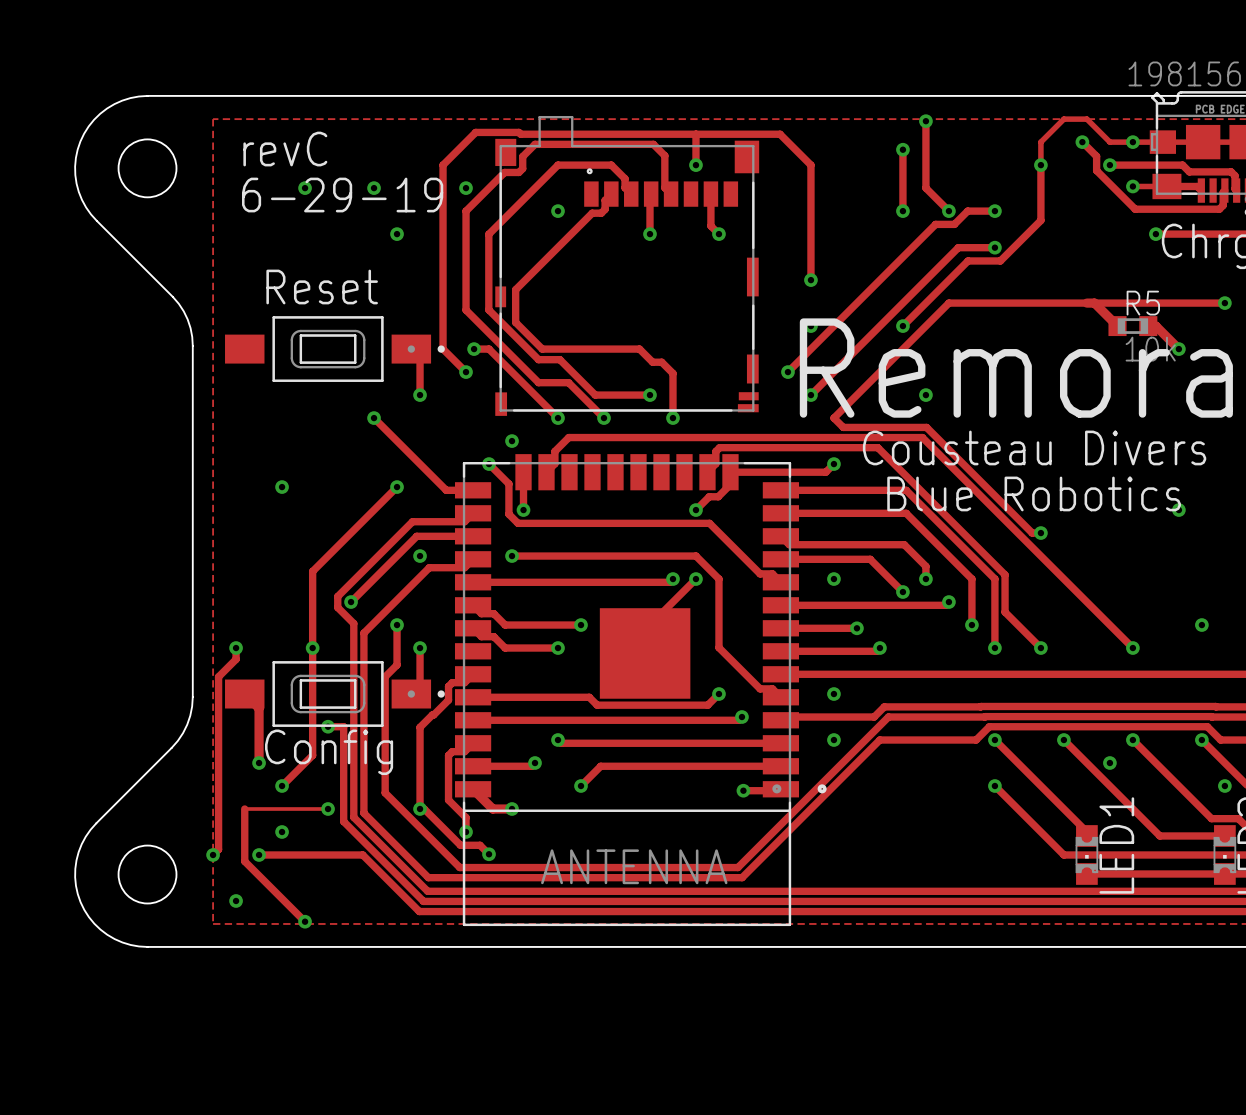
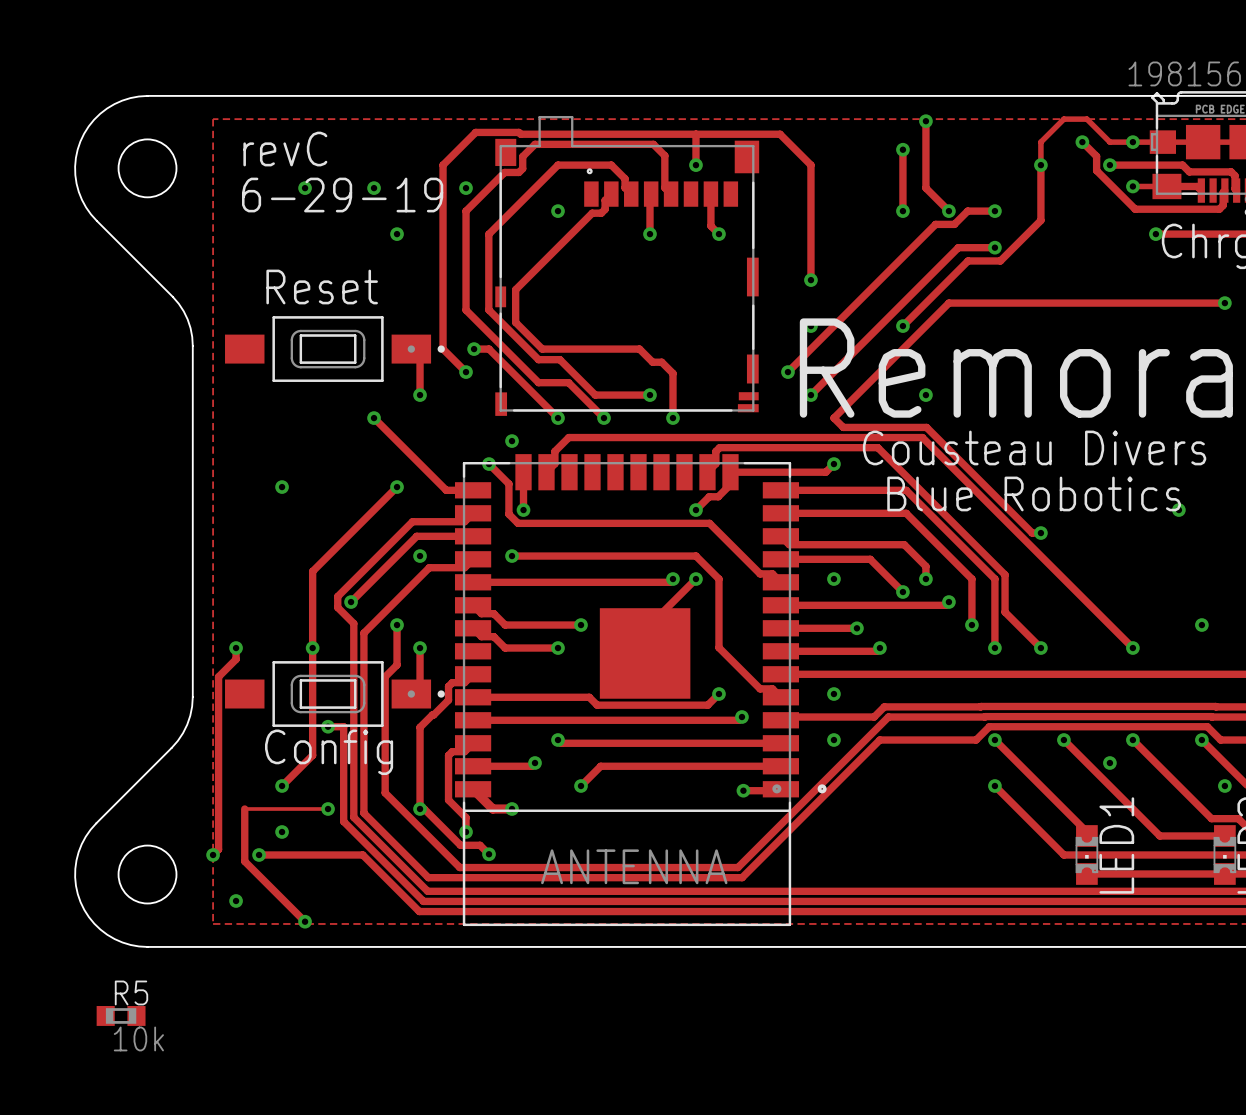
track: (1086, 303) (1094, 303) (1117, 326) -> none
R5 position: (1132, 326) -> (121, 1015)
track: (1148, 326) (1155, 326) (1178, 349) -> none
via: (1178, 349) -> none
track: (244, 694) (259, 708) (259, 763) -> none
via: (259, 763) -> none

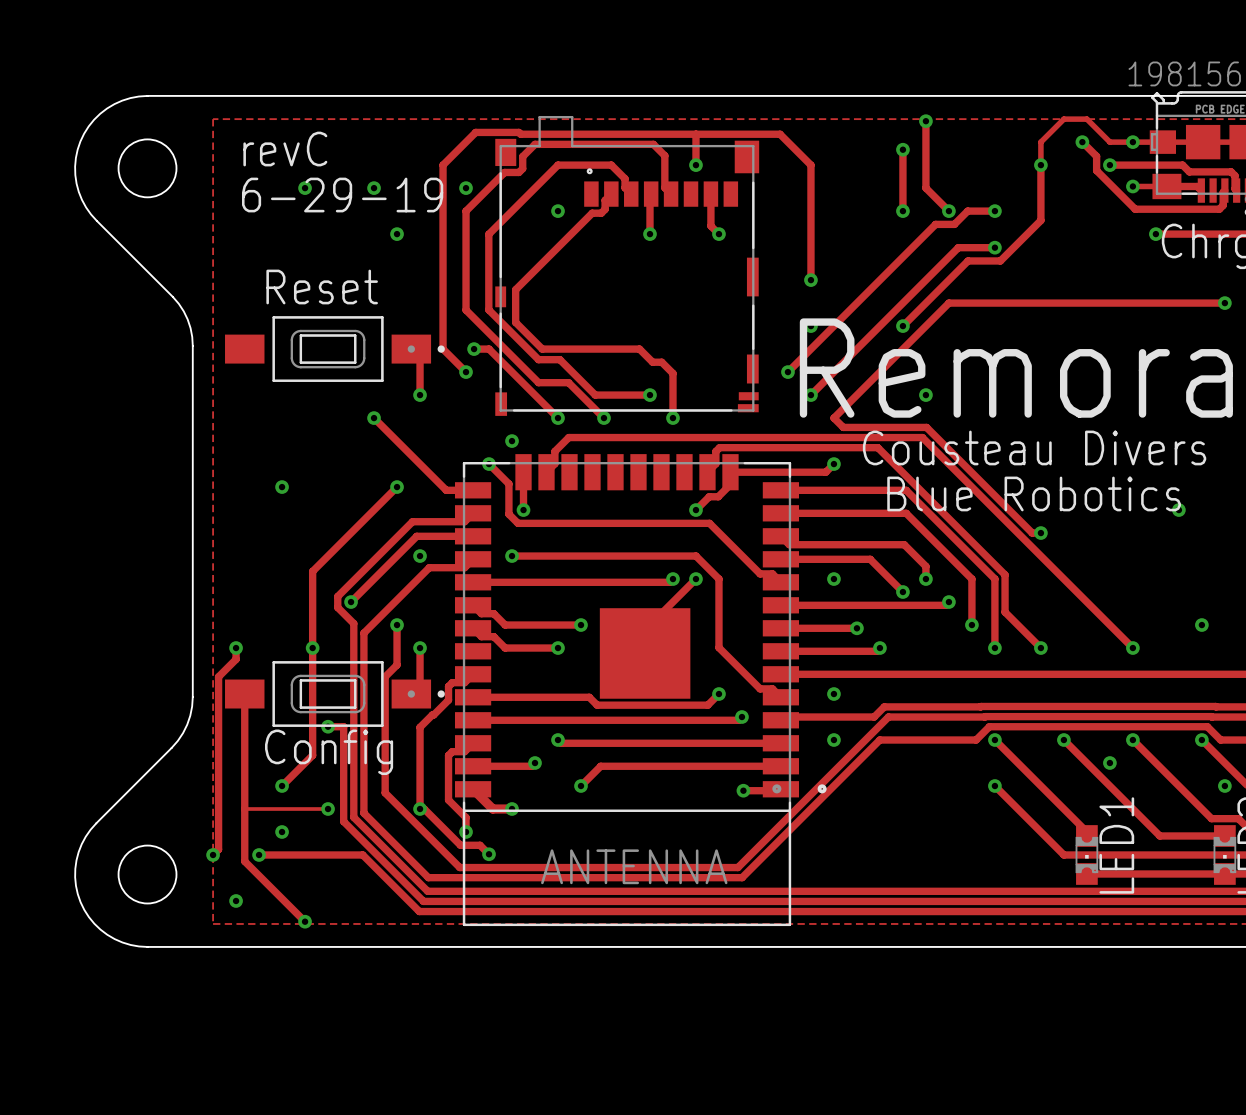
track: none -> (244, 694) (244, 809)
R5: 10k (121, 1015) -> none

